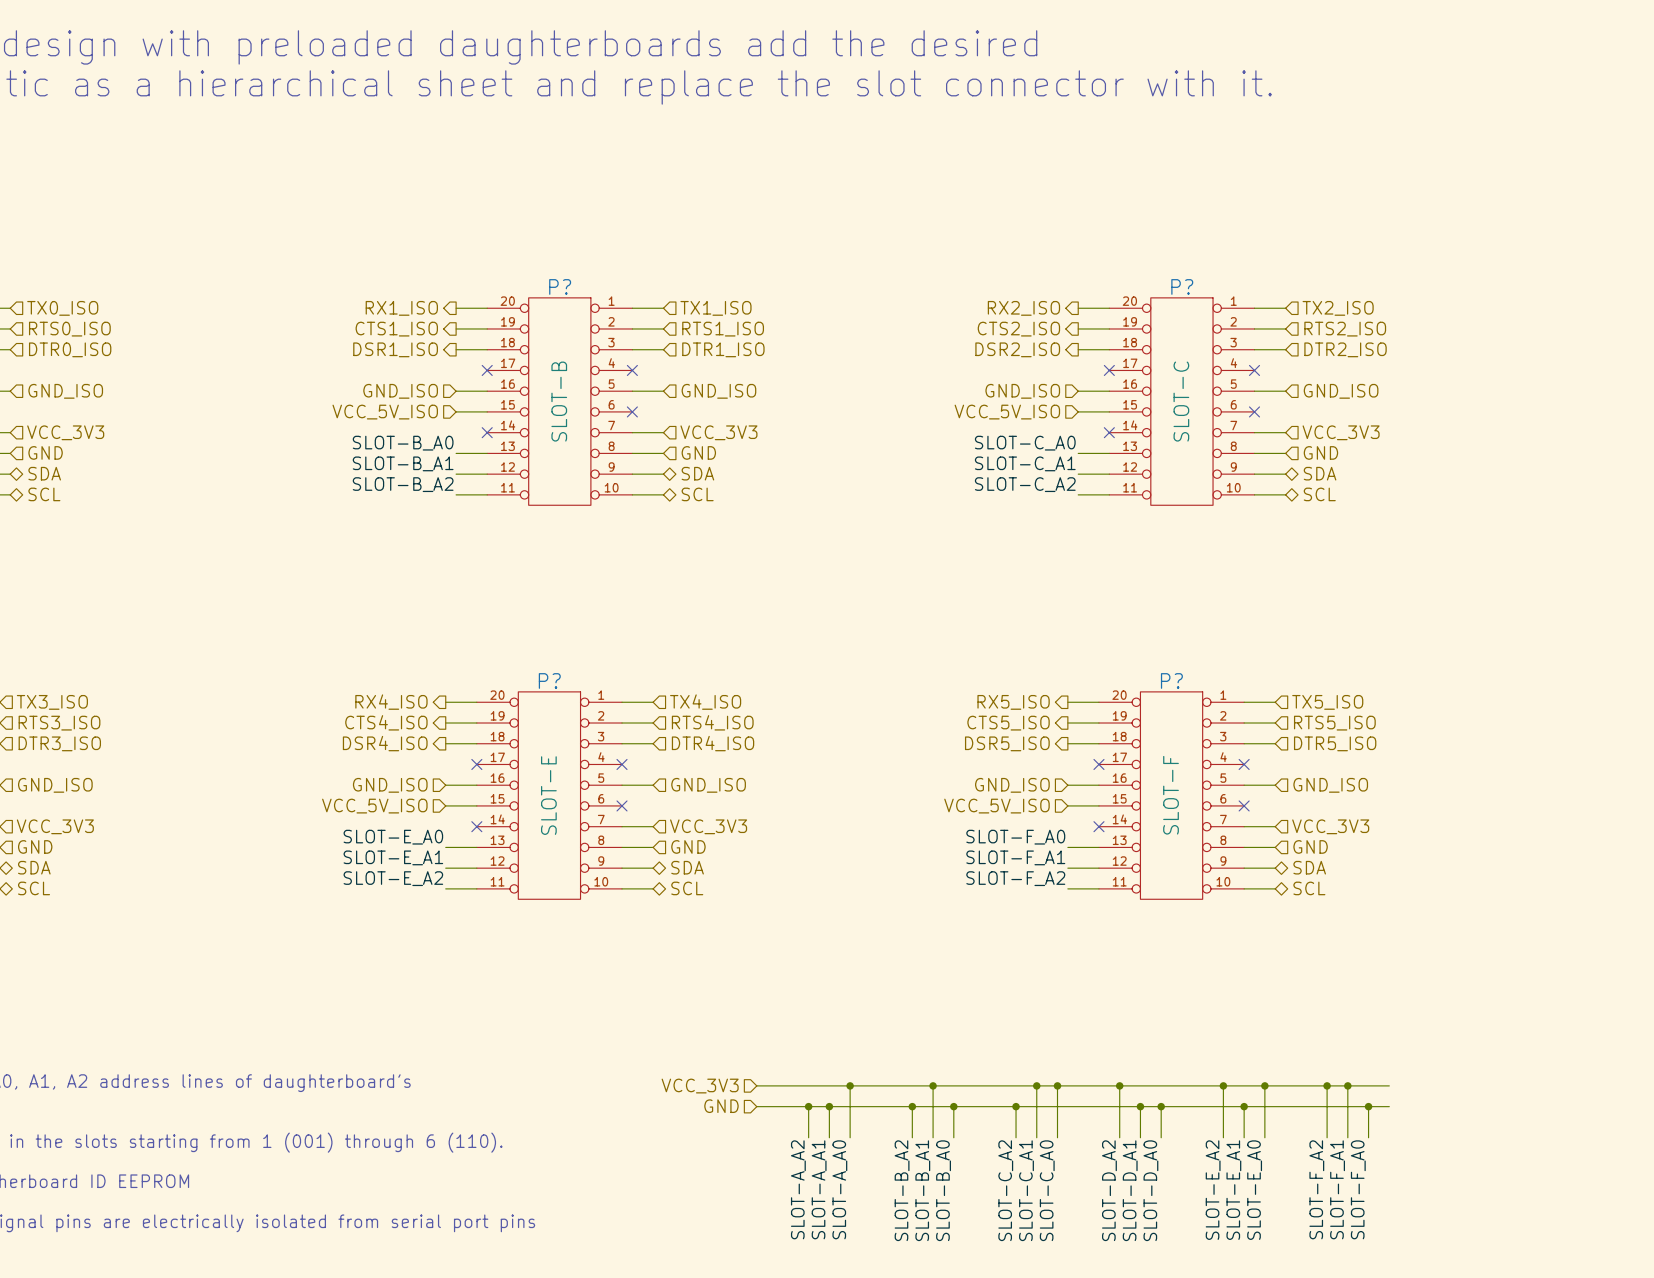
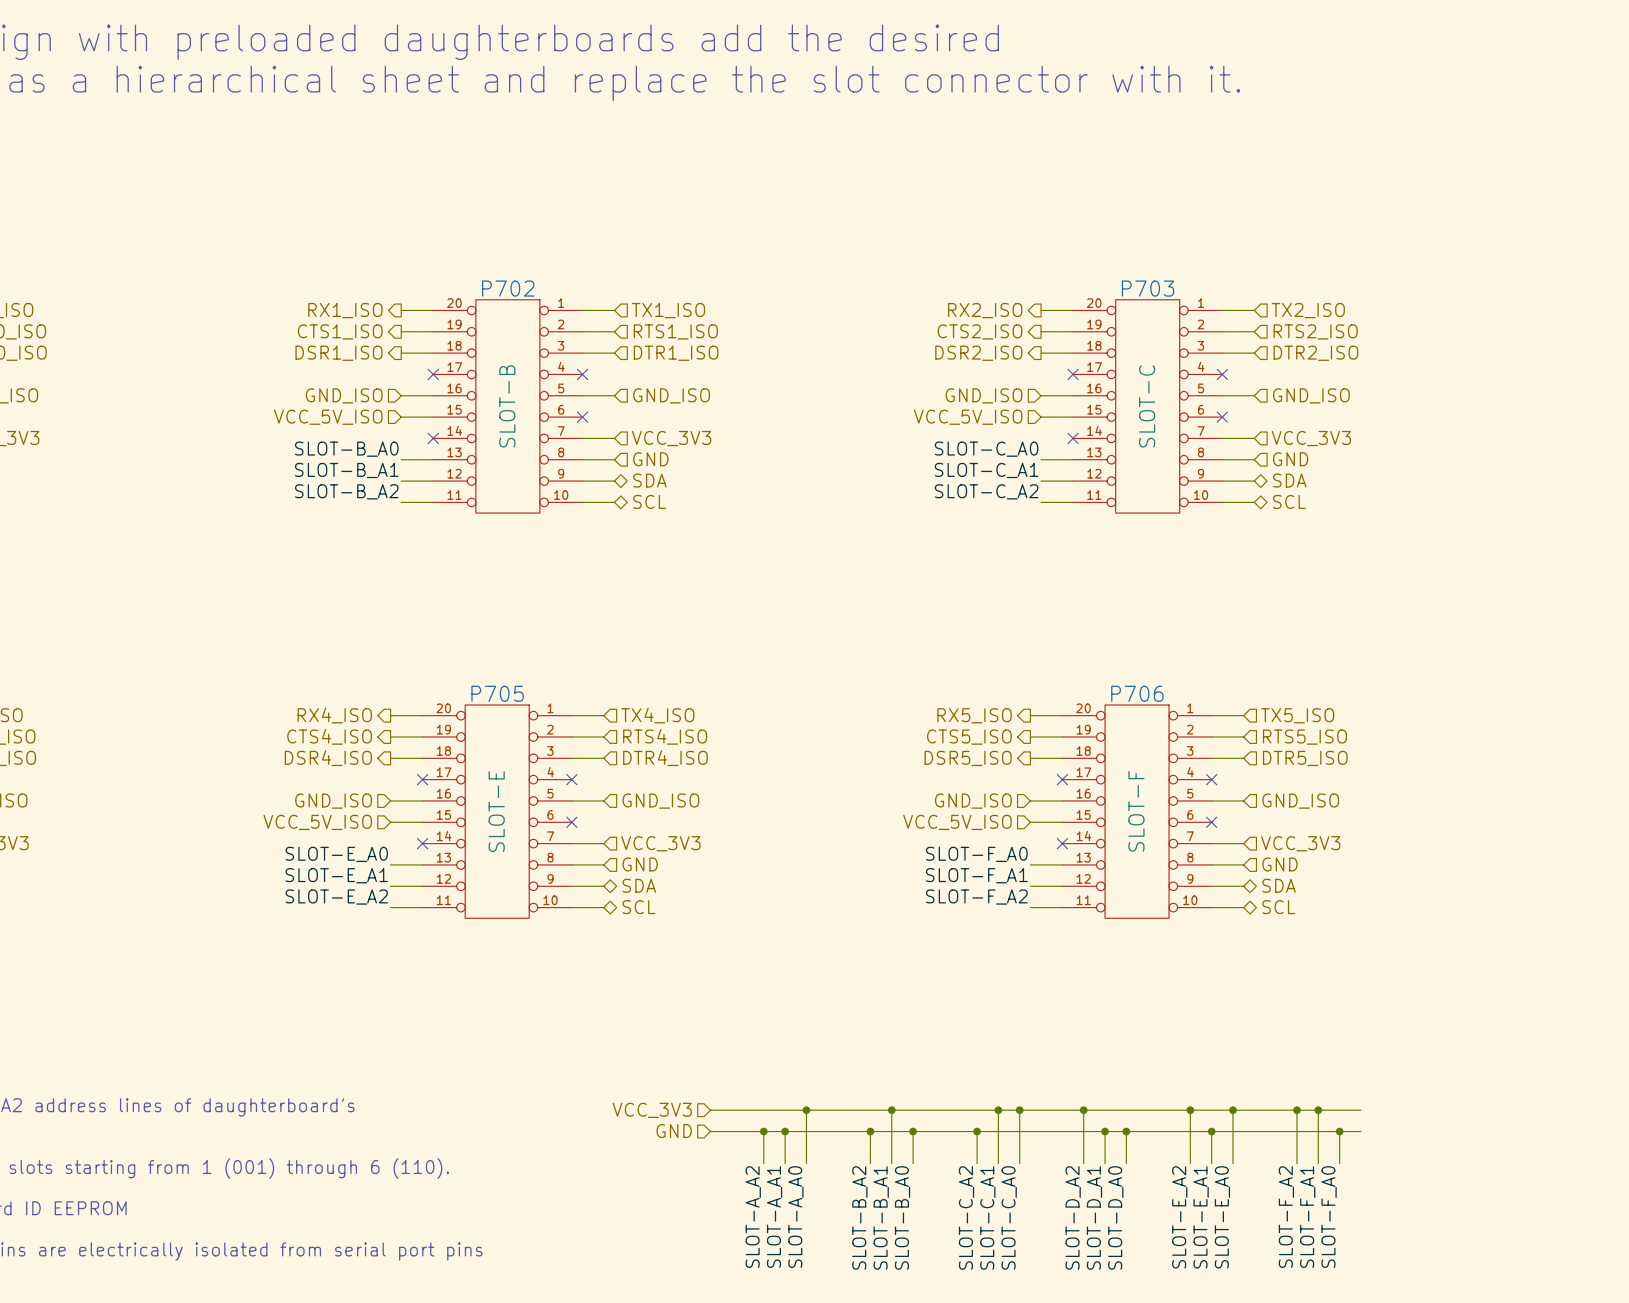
P? name: P? (560, 286) -> P702 (508, 288)
P? name: P? (1182, 286) -> P703 (1148, 288)
P? name: P? (549, 680) -> P705 (497, 693)
P? name: P? (1171, 680) -> P706 (1137, 693)

